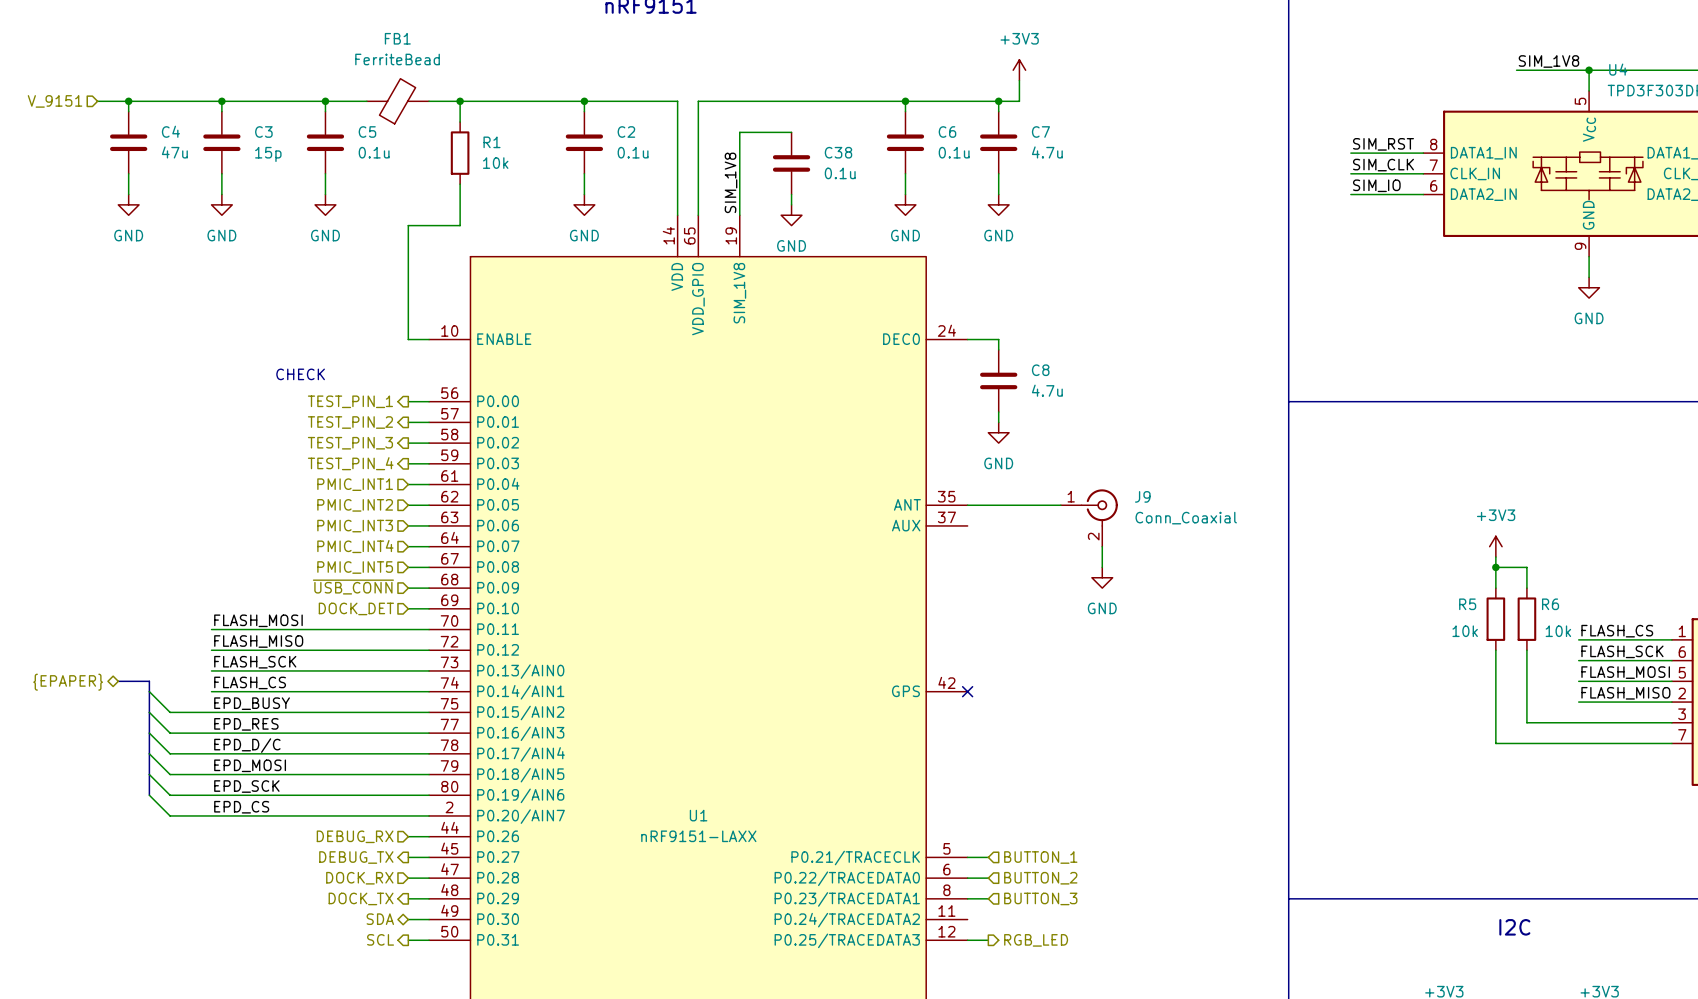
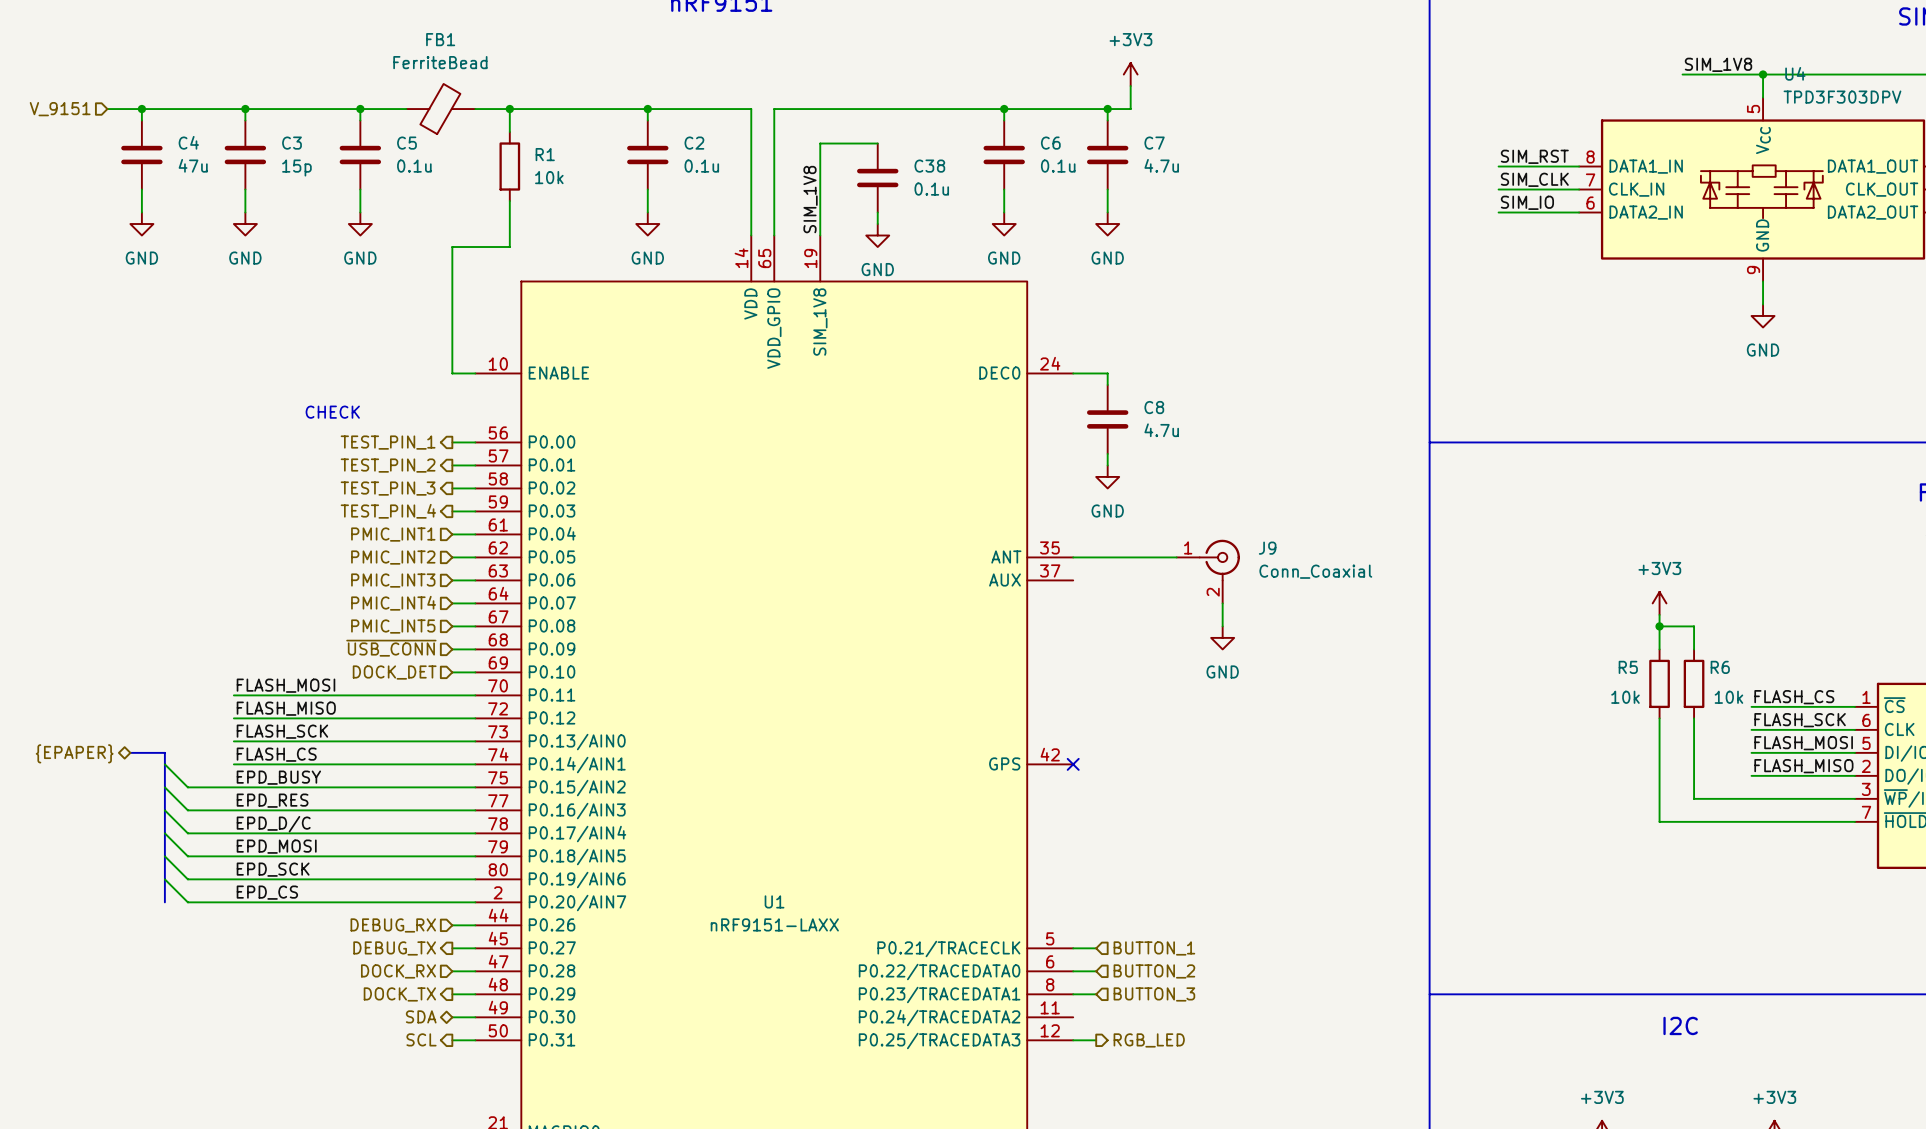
bus: none -> (164, 879) (164, 902)

